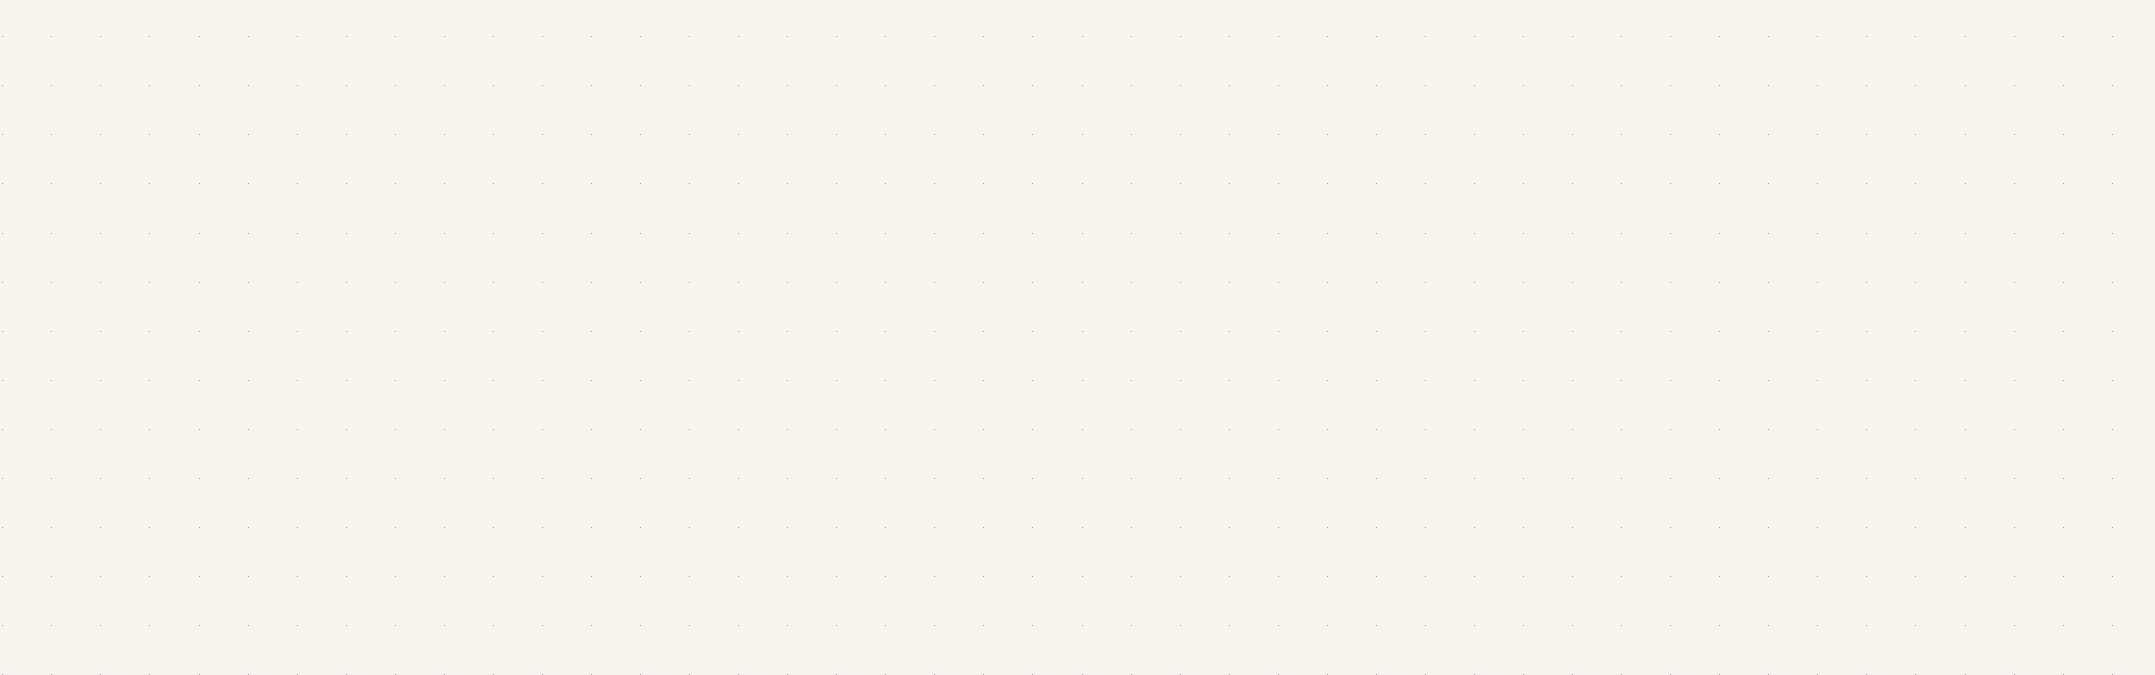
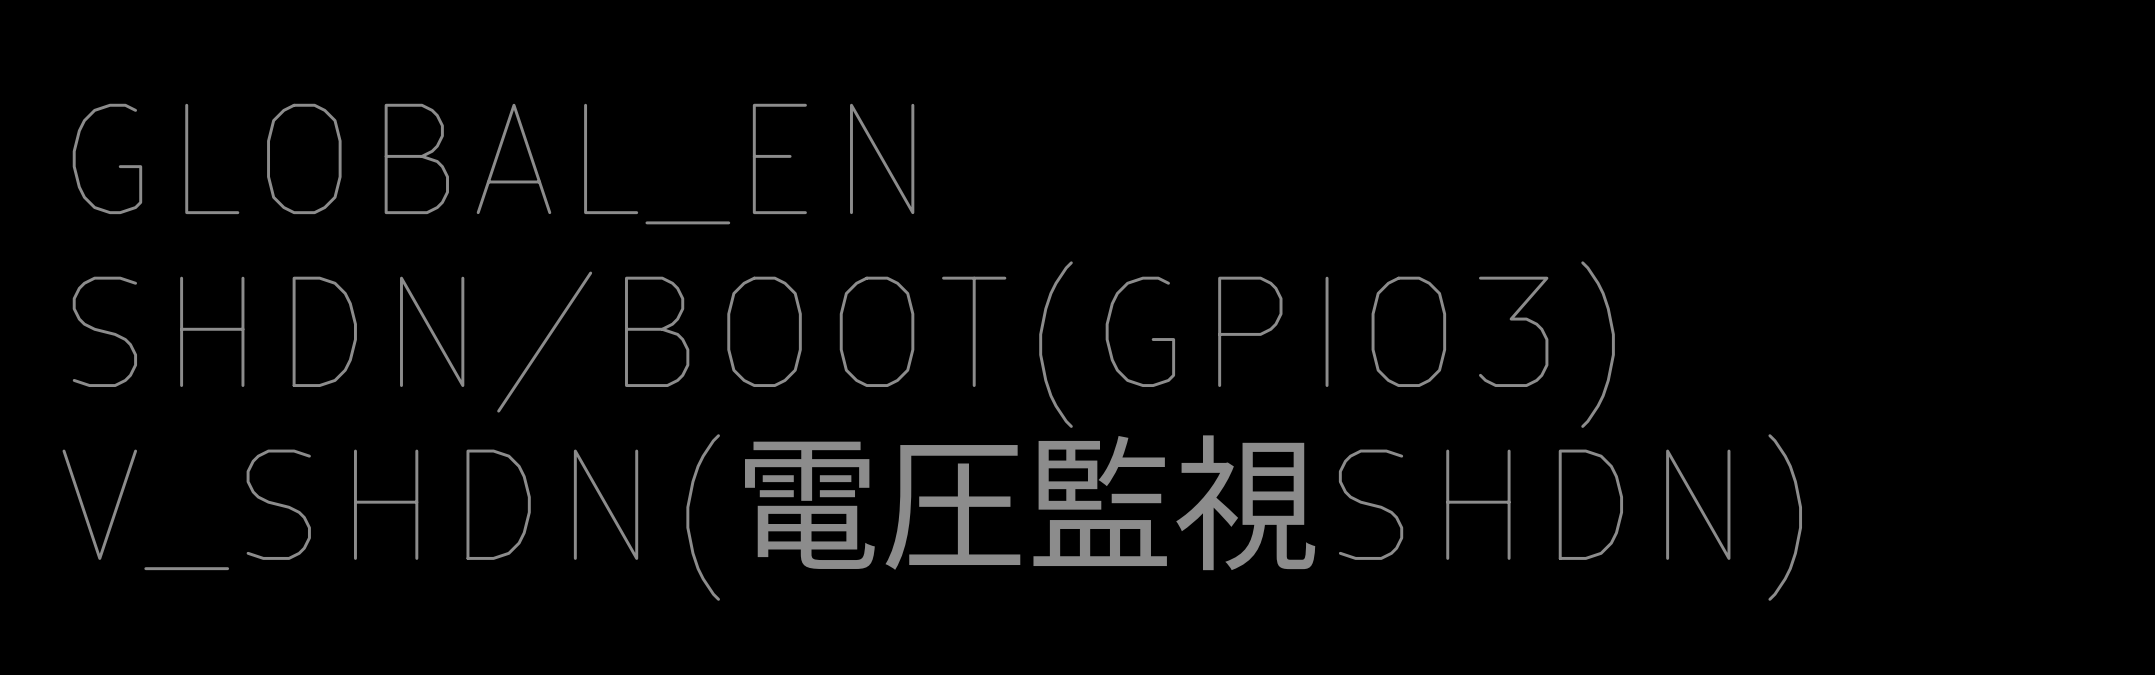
text: none -> GLOBAL_EN (493, 164)
text: none -> SHDN/BOOT(GPIO3) (843, 344)
text: none -> V_SHDN(電圧監視SHDN) (932, 517)

